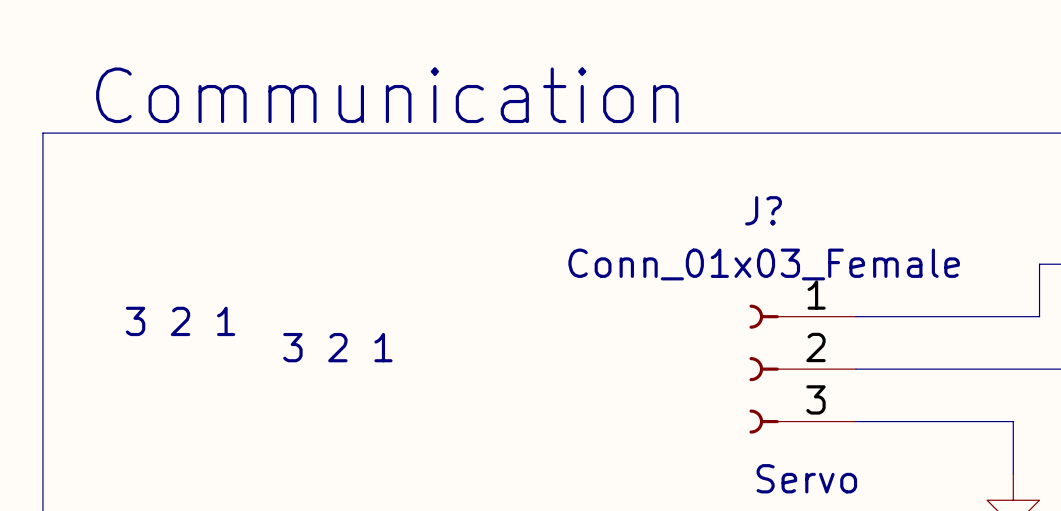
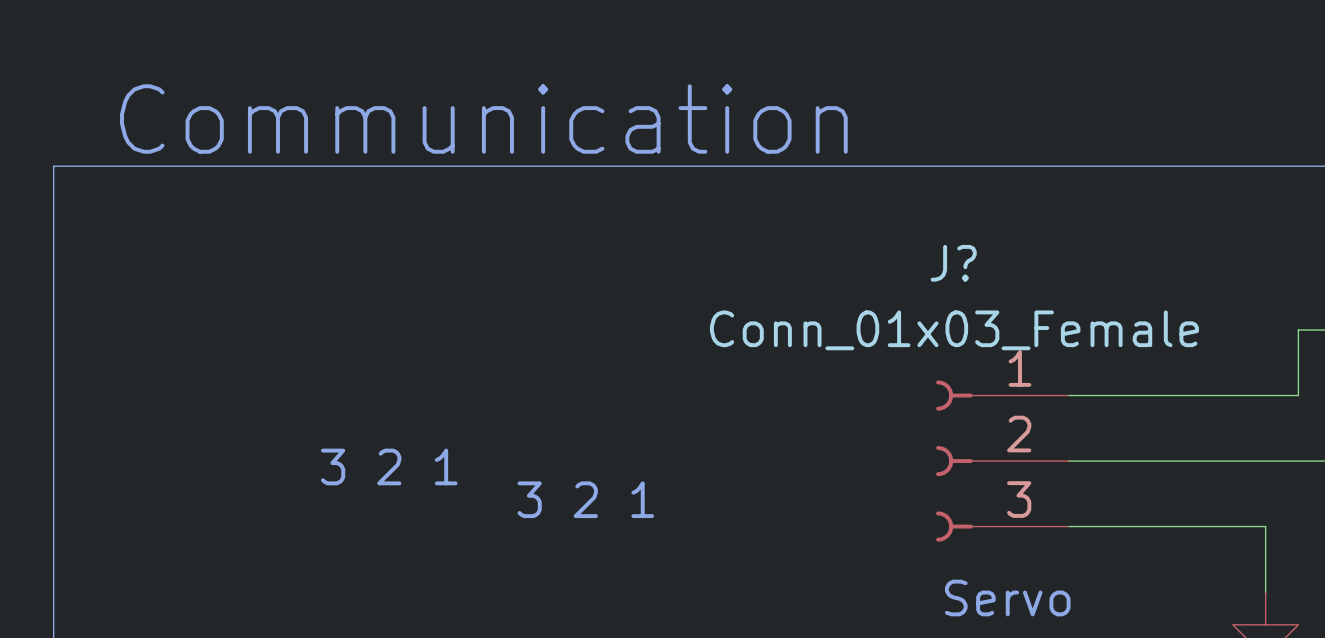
text: 3 2 1 (180, 321) -> none
text position: 3 2 1 (337, 347) -> 3 2 1 (389, 466)
text: none -> 3 2 1 (585, 499)

